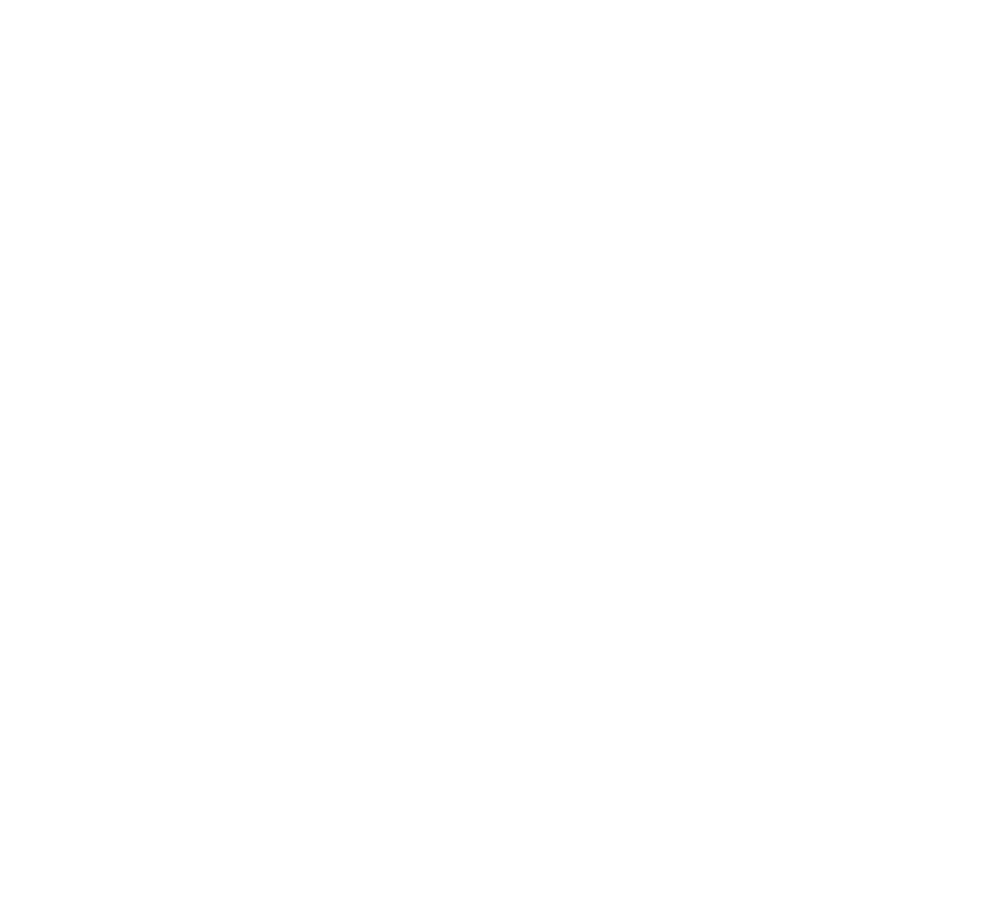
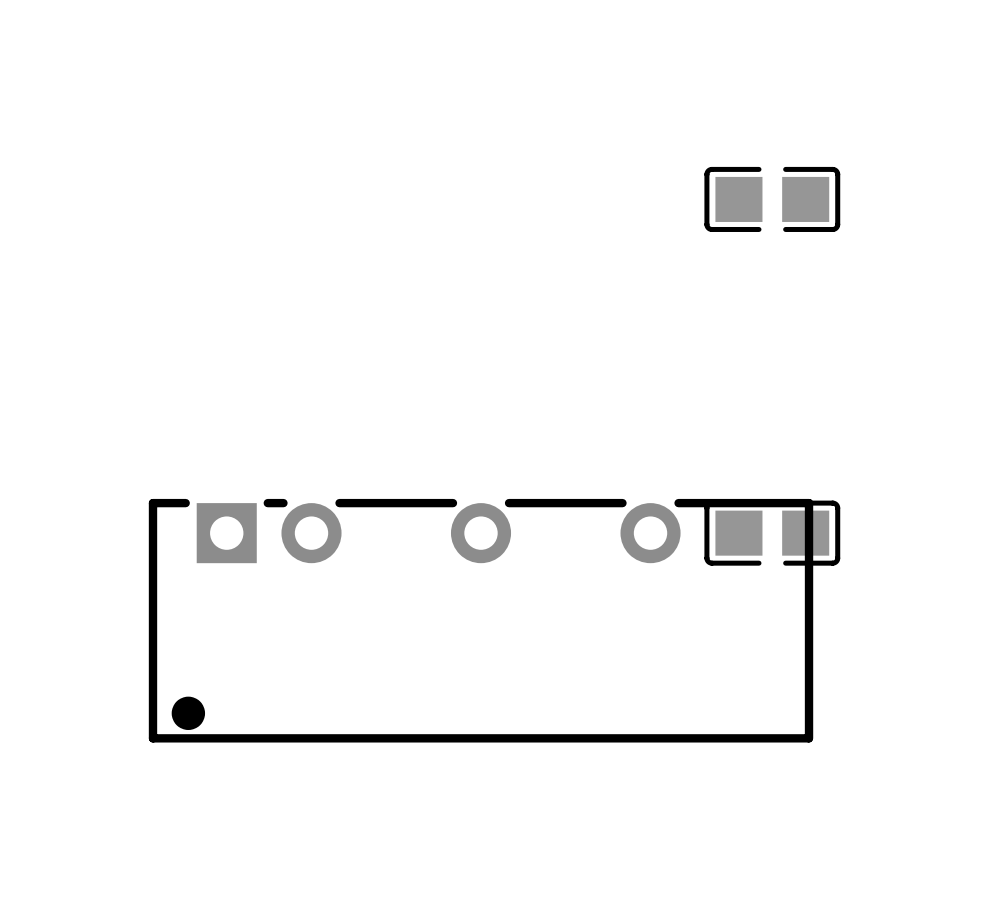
part: none -> (772, 199)
part: none -> (772, 533)
part: none -> (481, 620)

